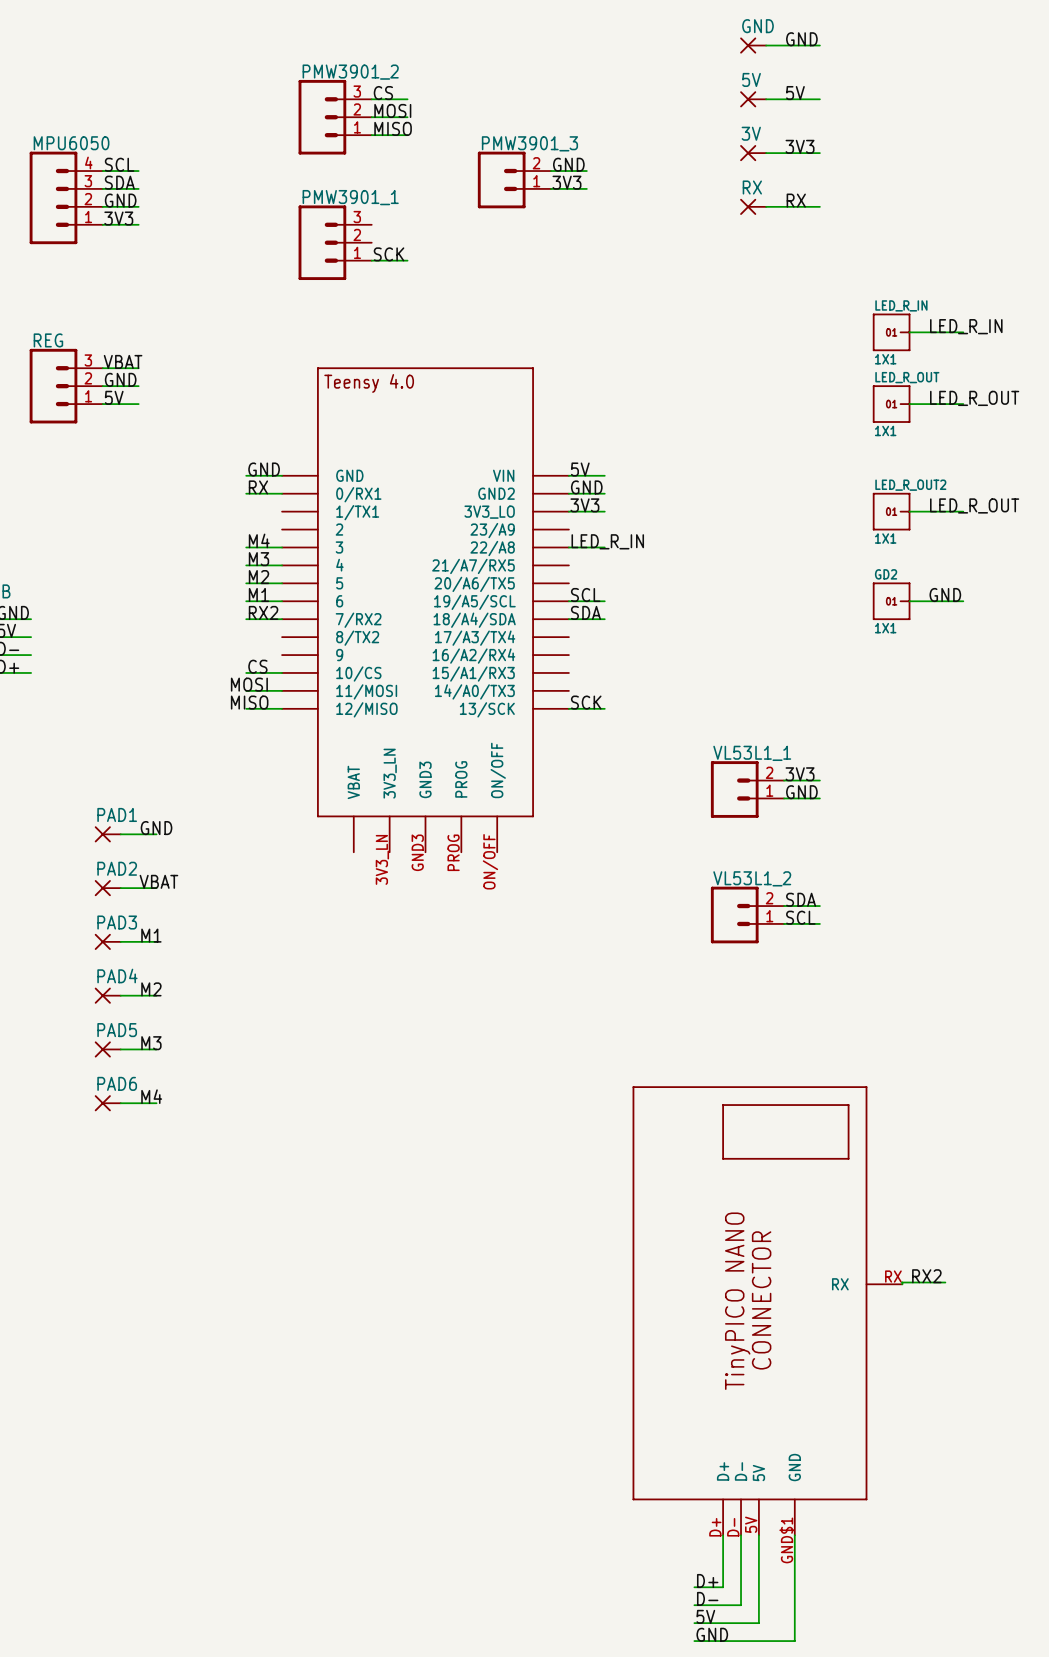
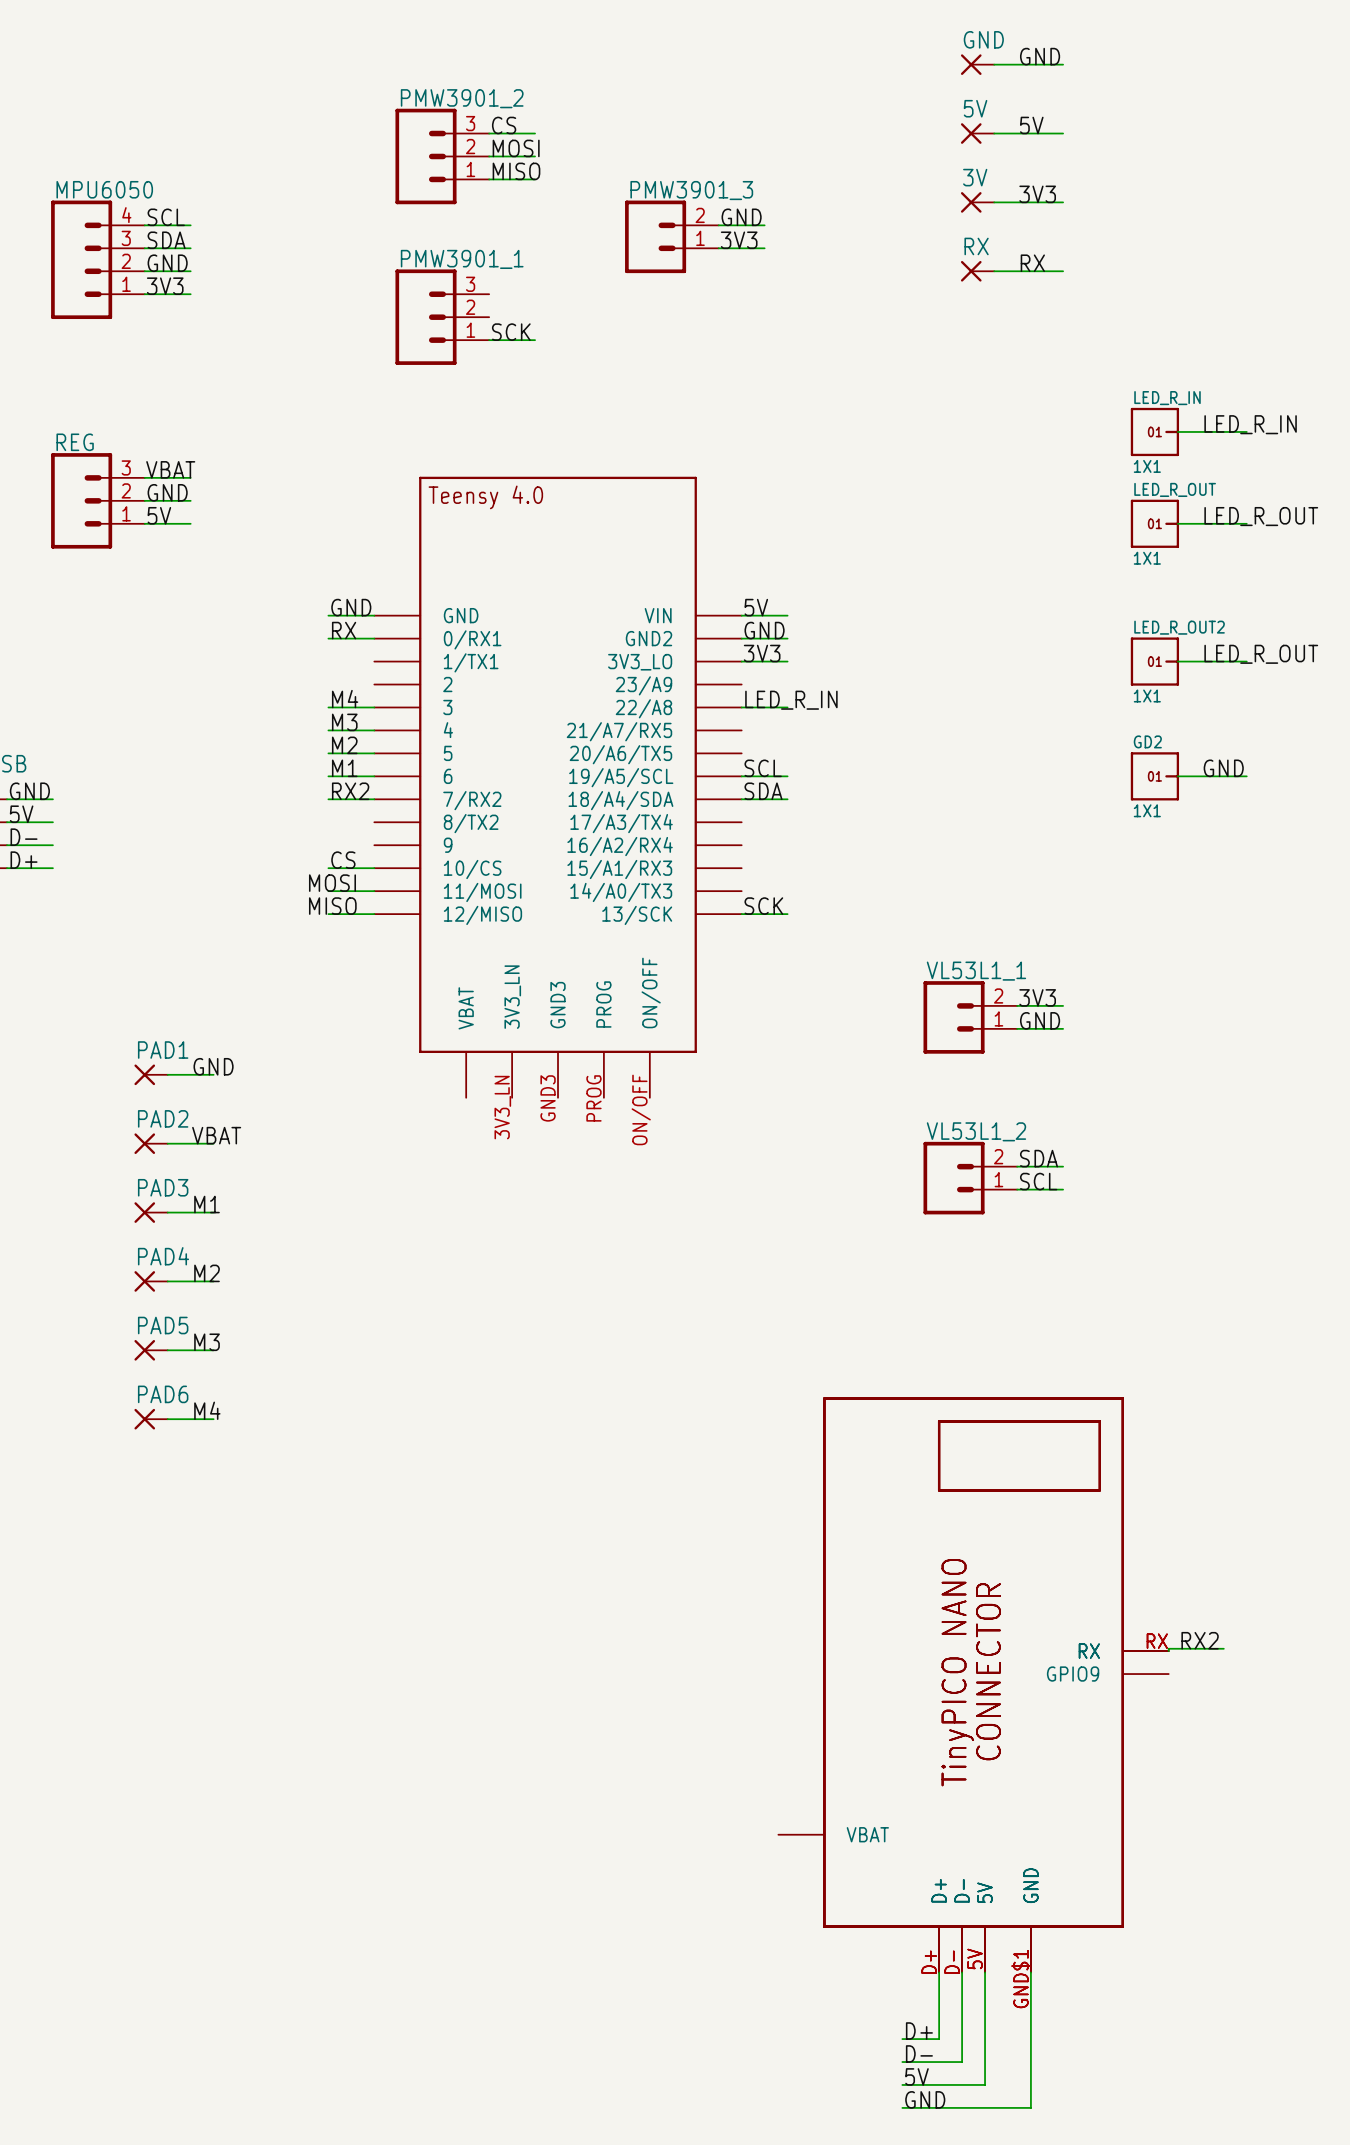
part: none -> (973, 1684)

